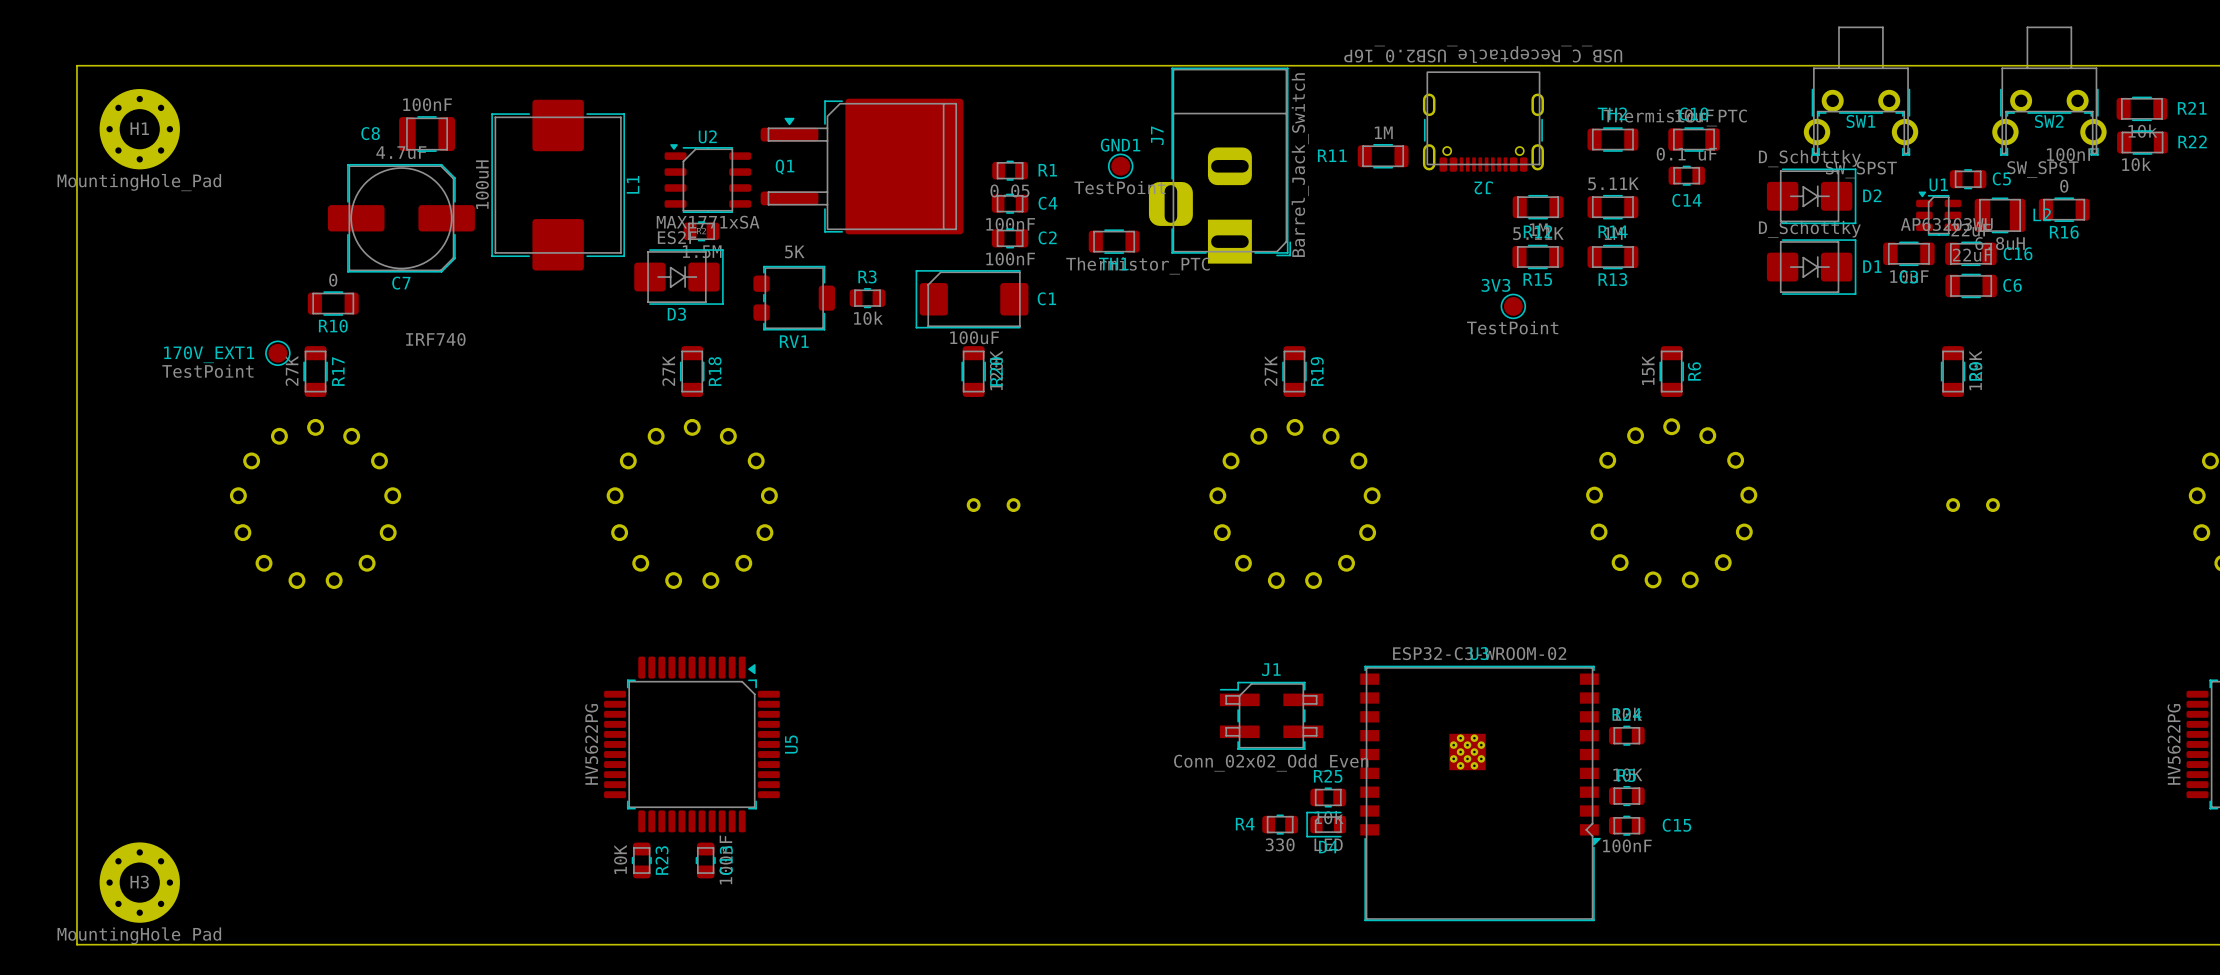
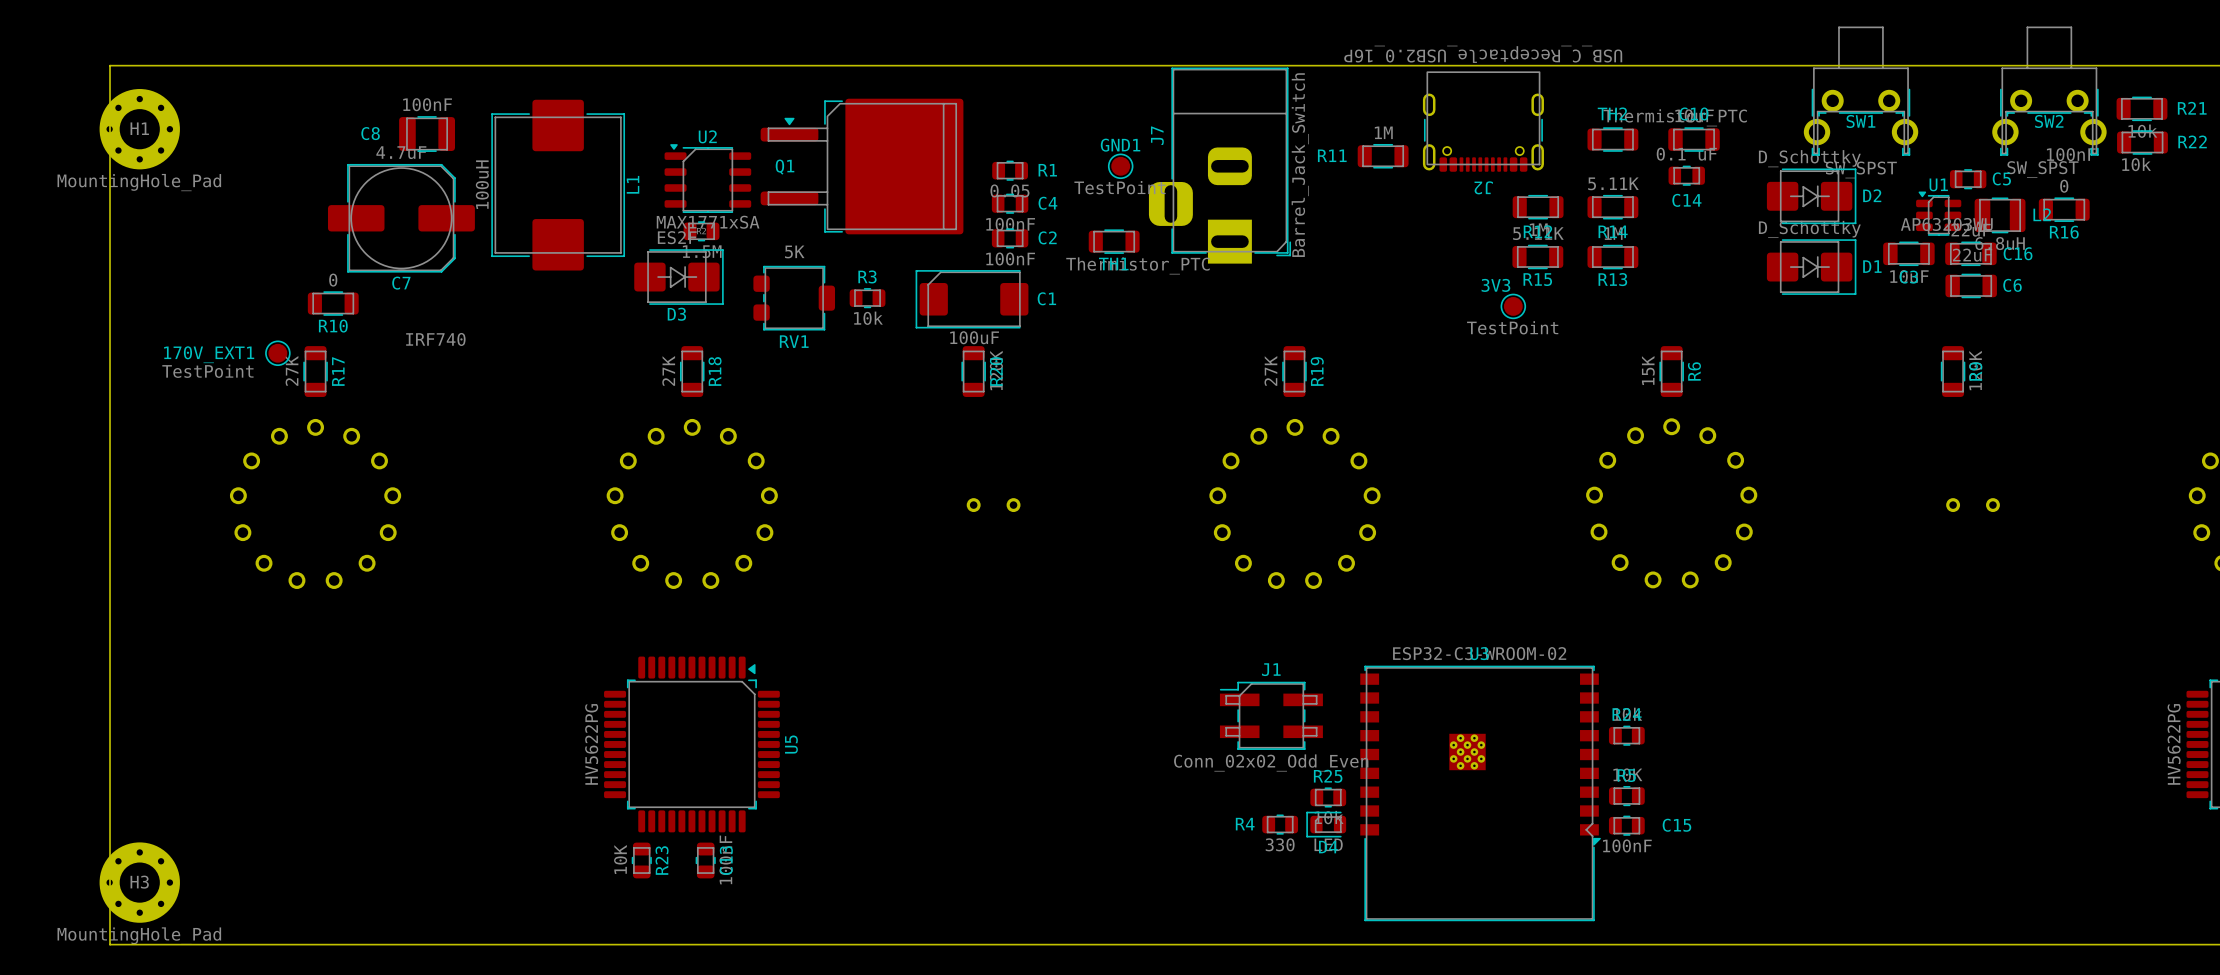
board edge: (110, 65) (76, 65) (76, 944) (110, 944) -> (110, 65) (110, 944)

